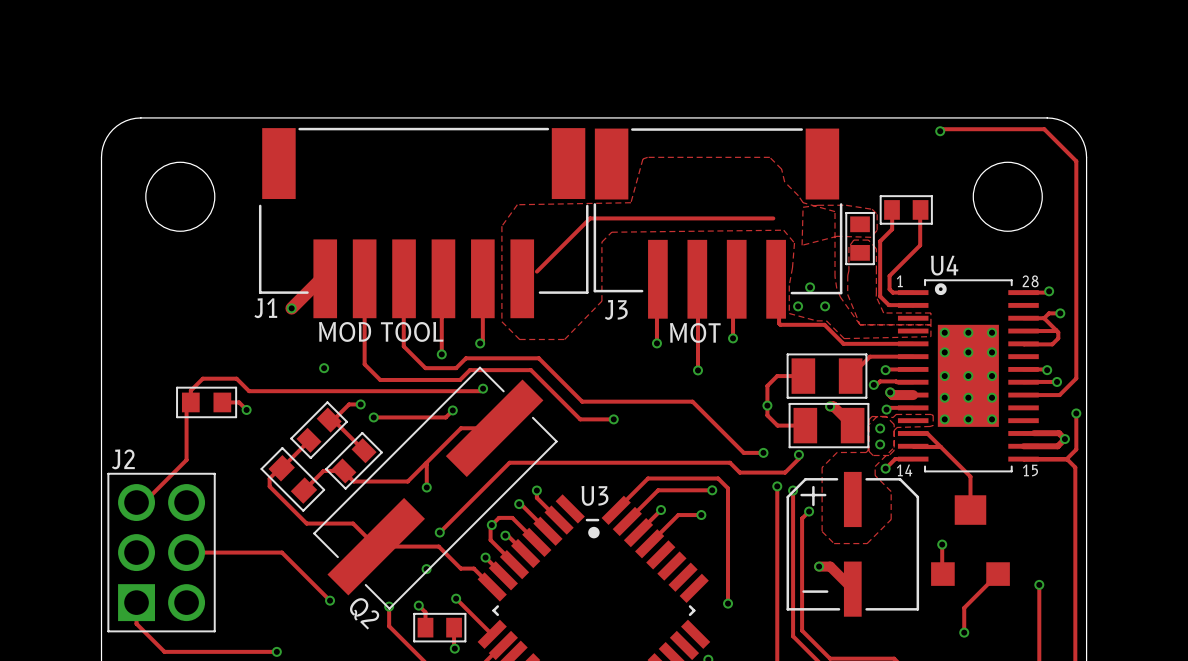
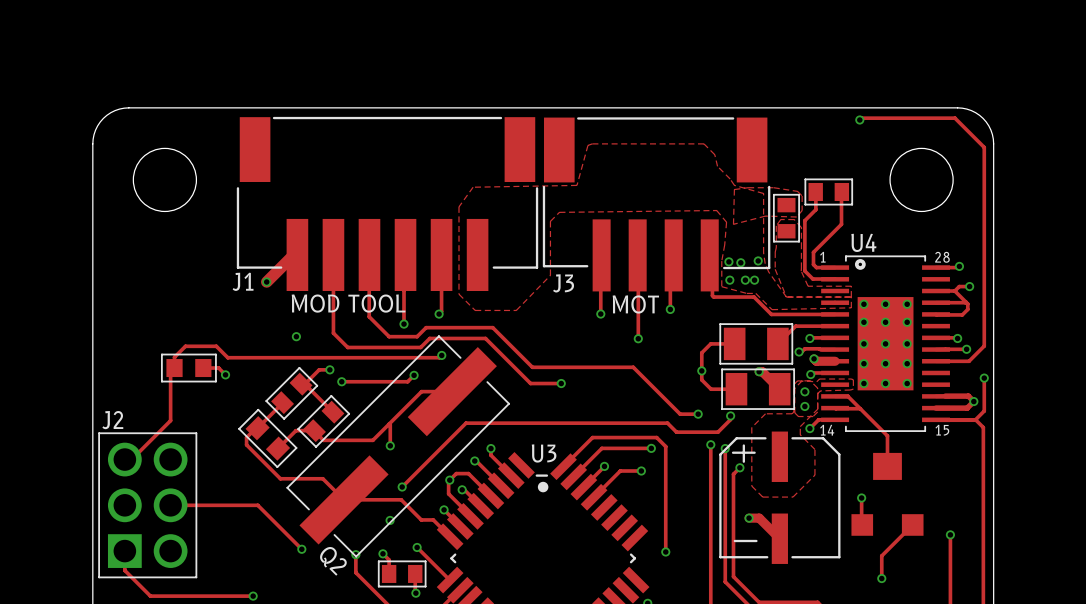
track: (773, 218) (590, 218) (536, 271) -> none
via: none -> (758, 260)
via: none -> (728, 261)
via: none -> (745, 280)

